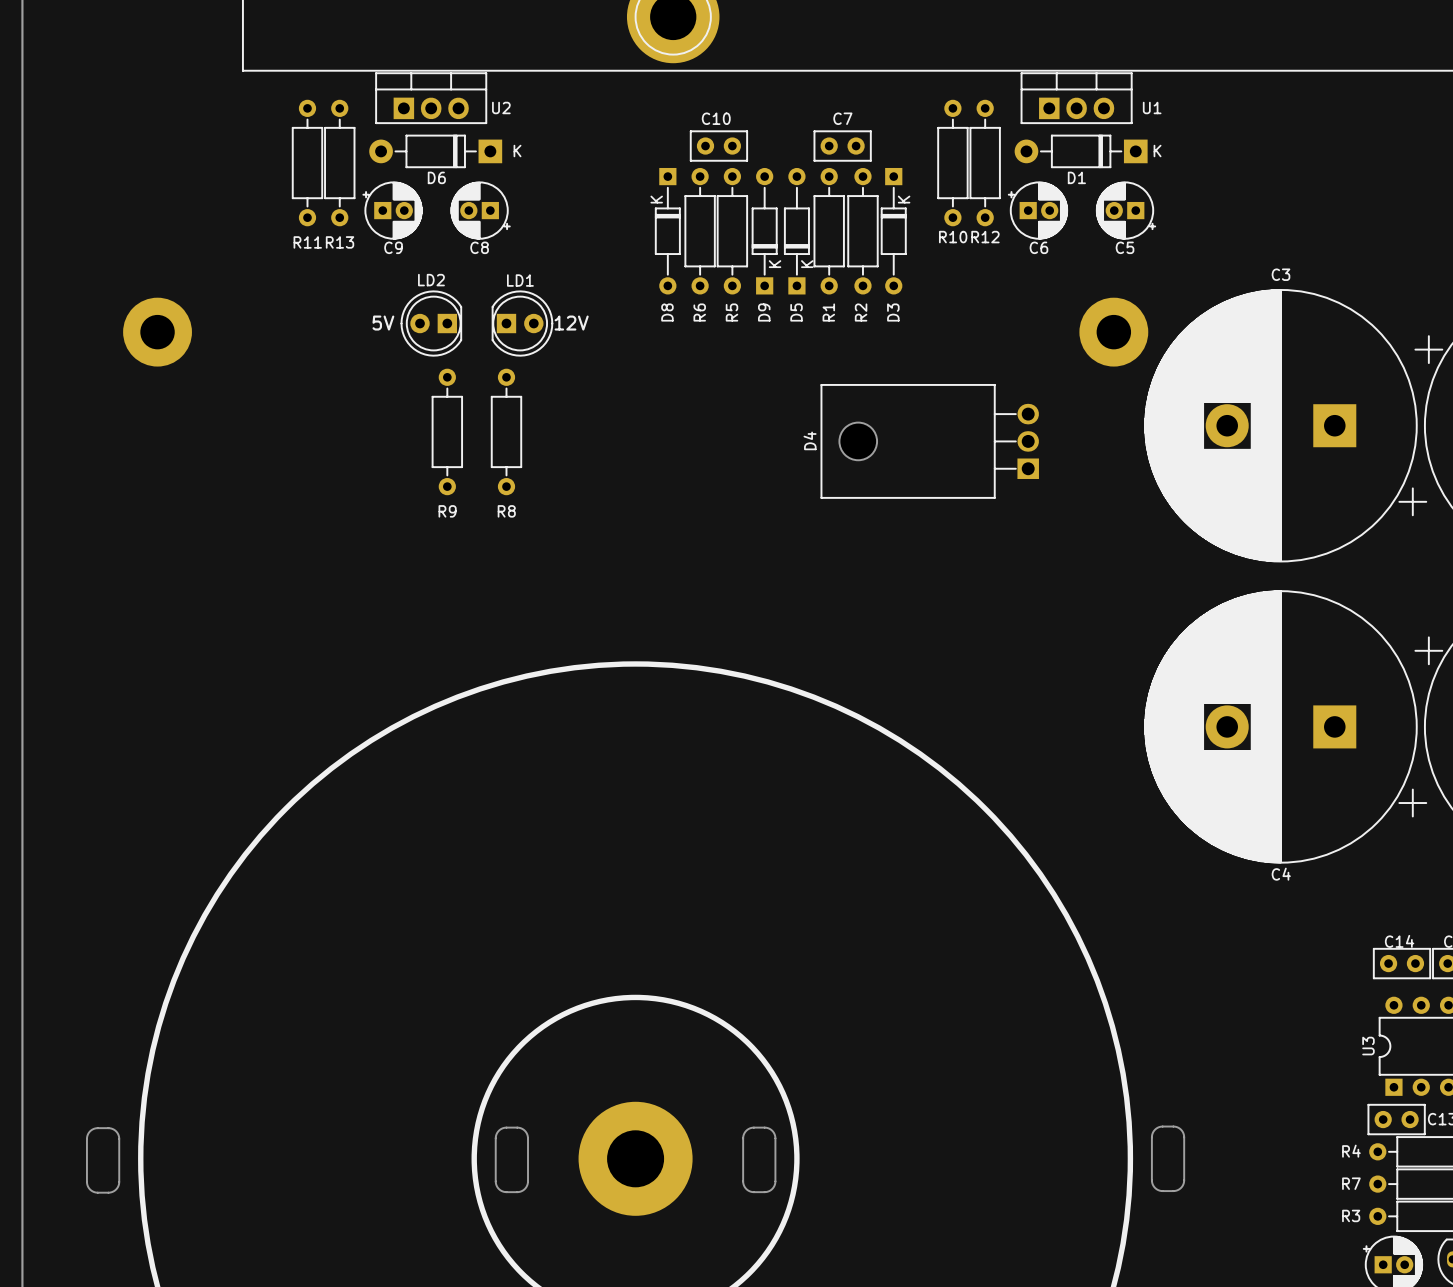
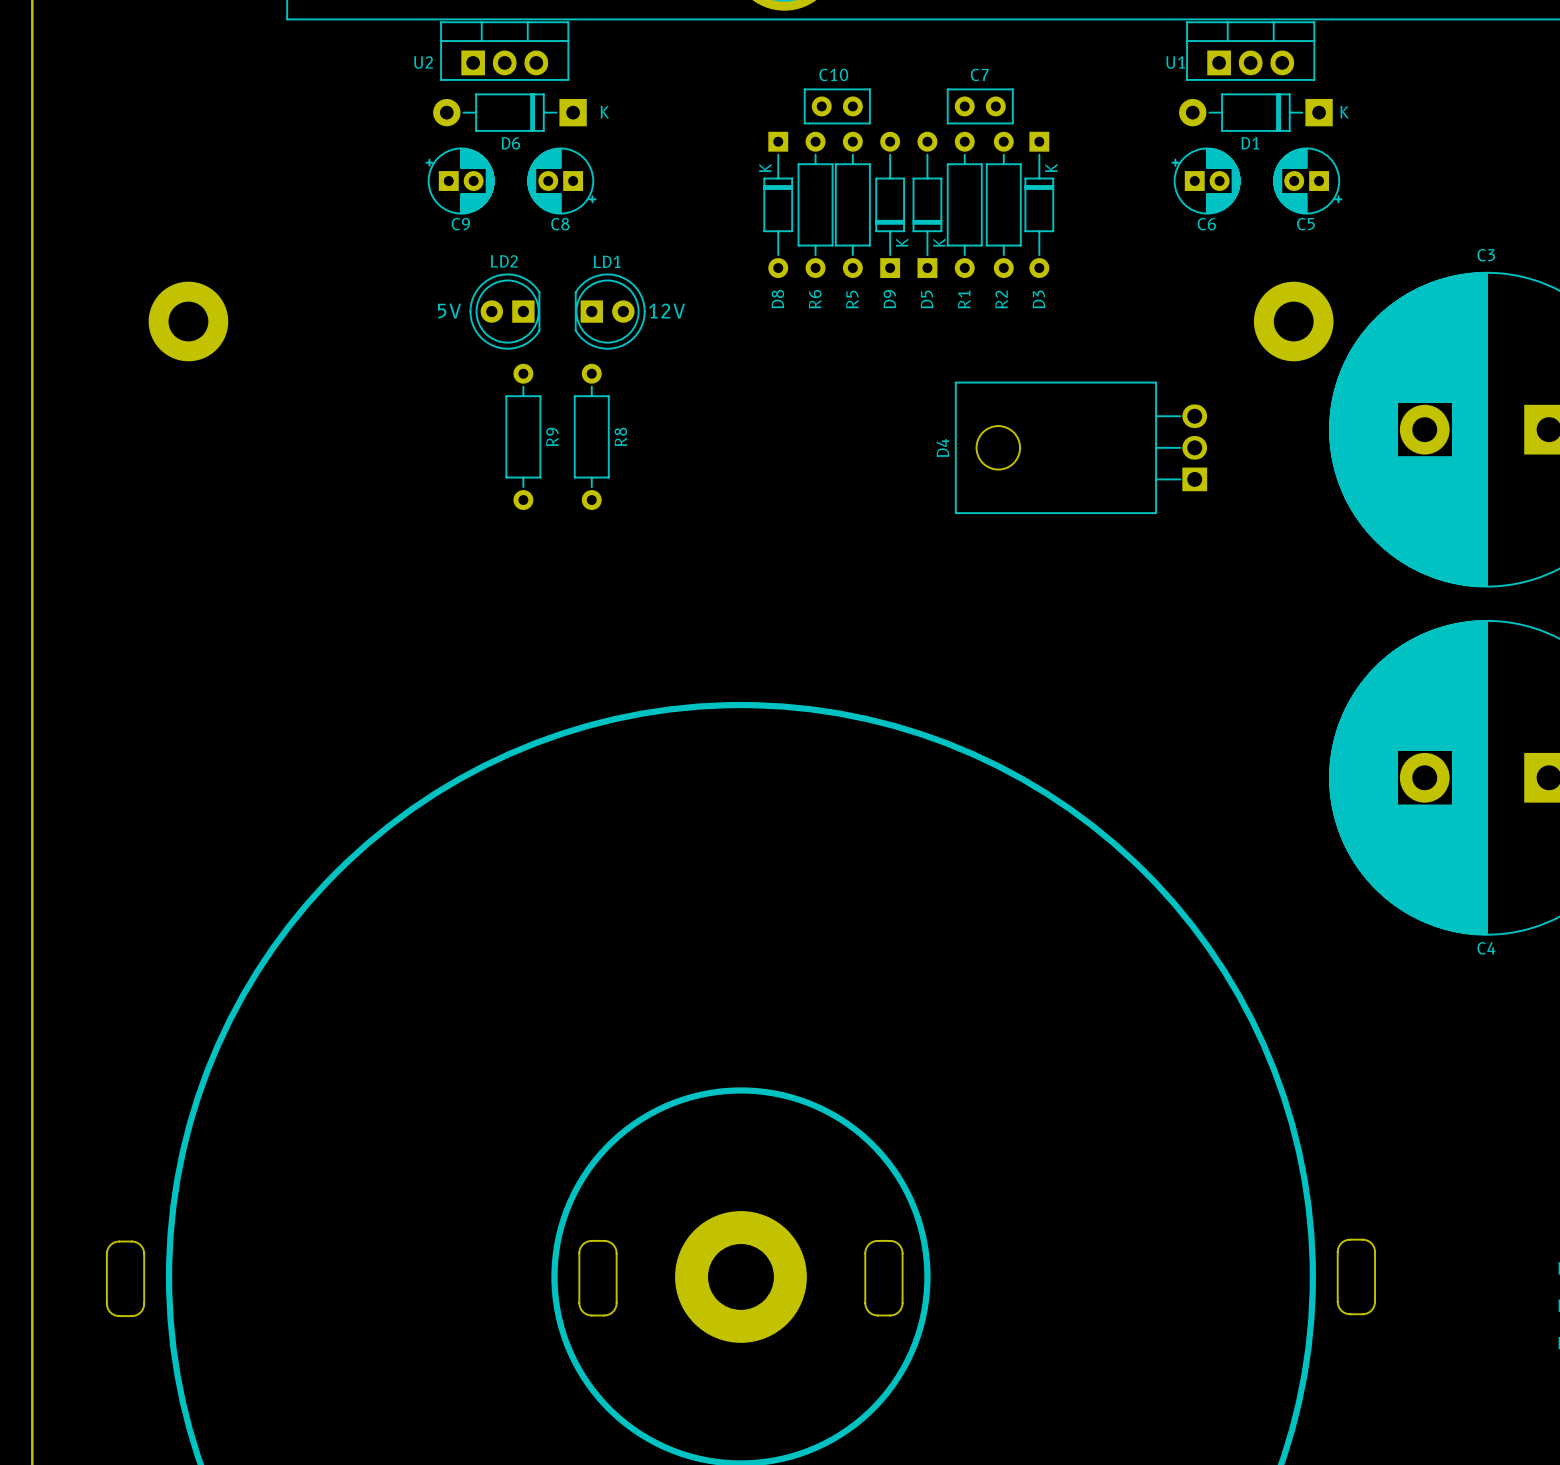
U2 name position: U2 (501, 107) -> U2 (423, 62)
U1 name position: U1 (1152, 107) -> U1 (1175, 62)
R11: (307, 163) -> none
R13: (339, 163) -> none
R10: (952, 163) -> none
R12: (985, 163) -> none
R9 name rotation: 0° (447, 511) -> 90° counterclockwise (552, 436)
R9 name position: R9 (447, 511) -> R9 (552, 436)
R8 name rotation: 0° (506, 511) -> 90° counterclockwise (620, 436)
R8 name position: R8 (506, 511) -> R8 (620, 436)

